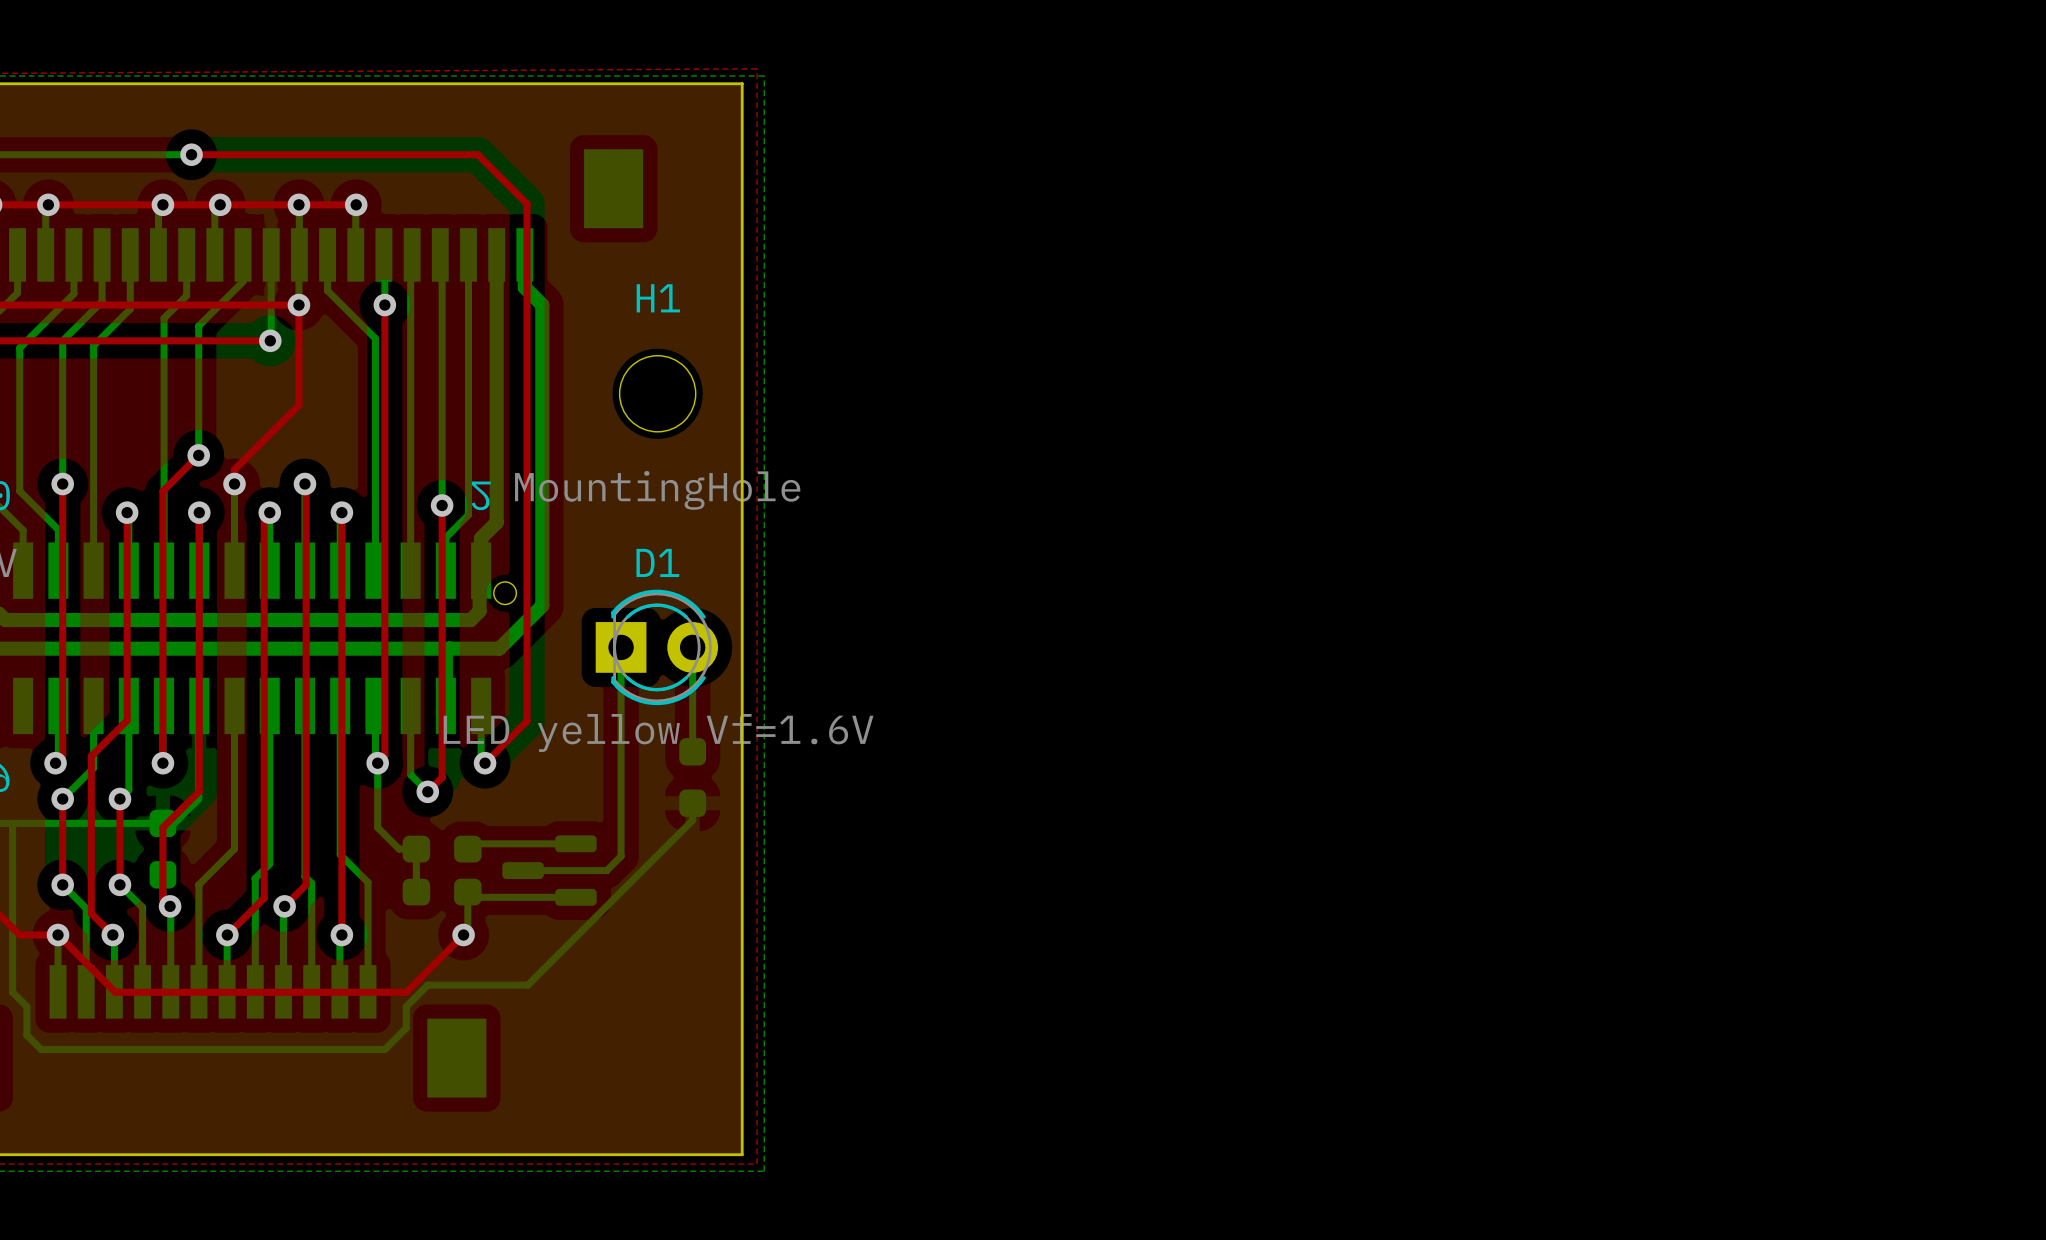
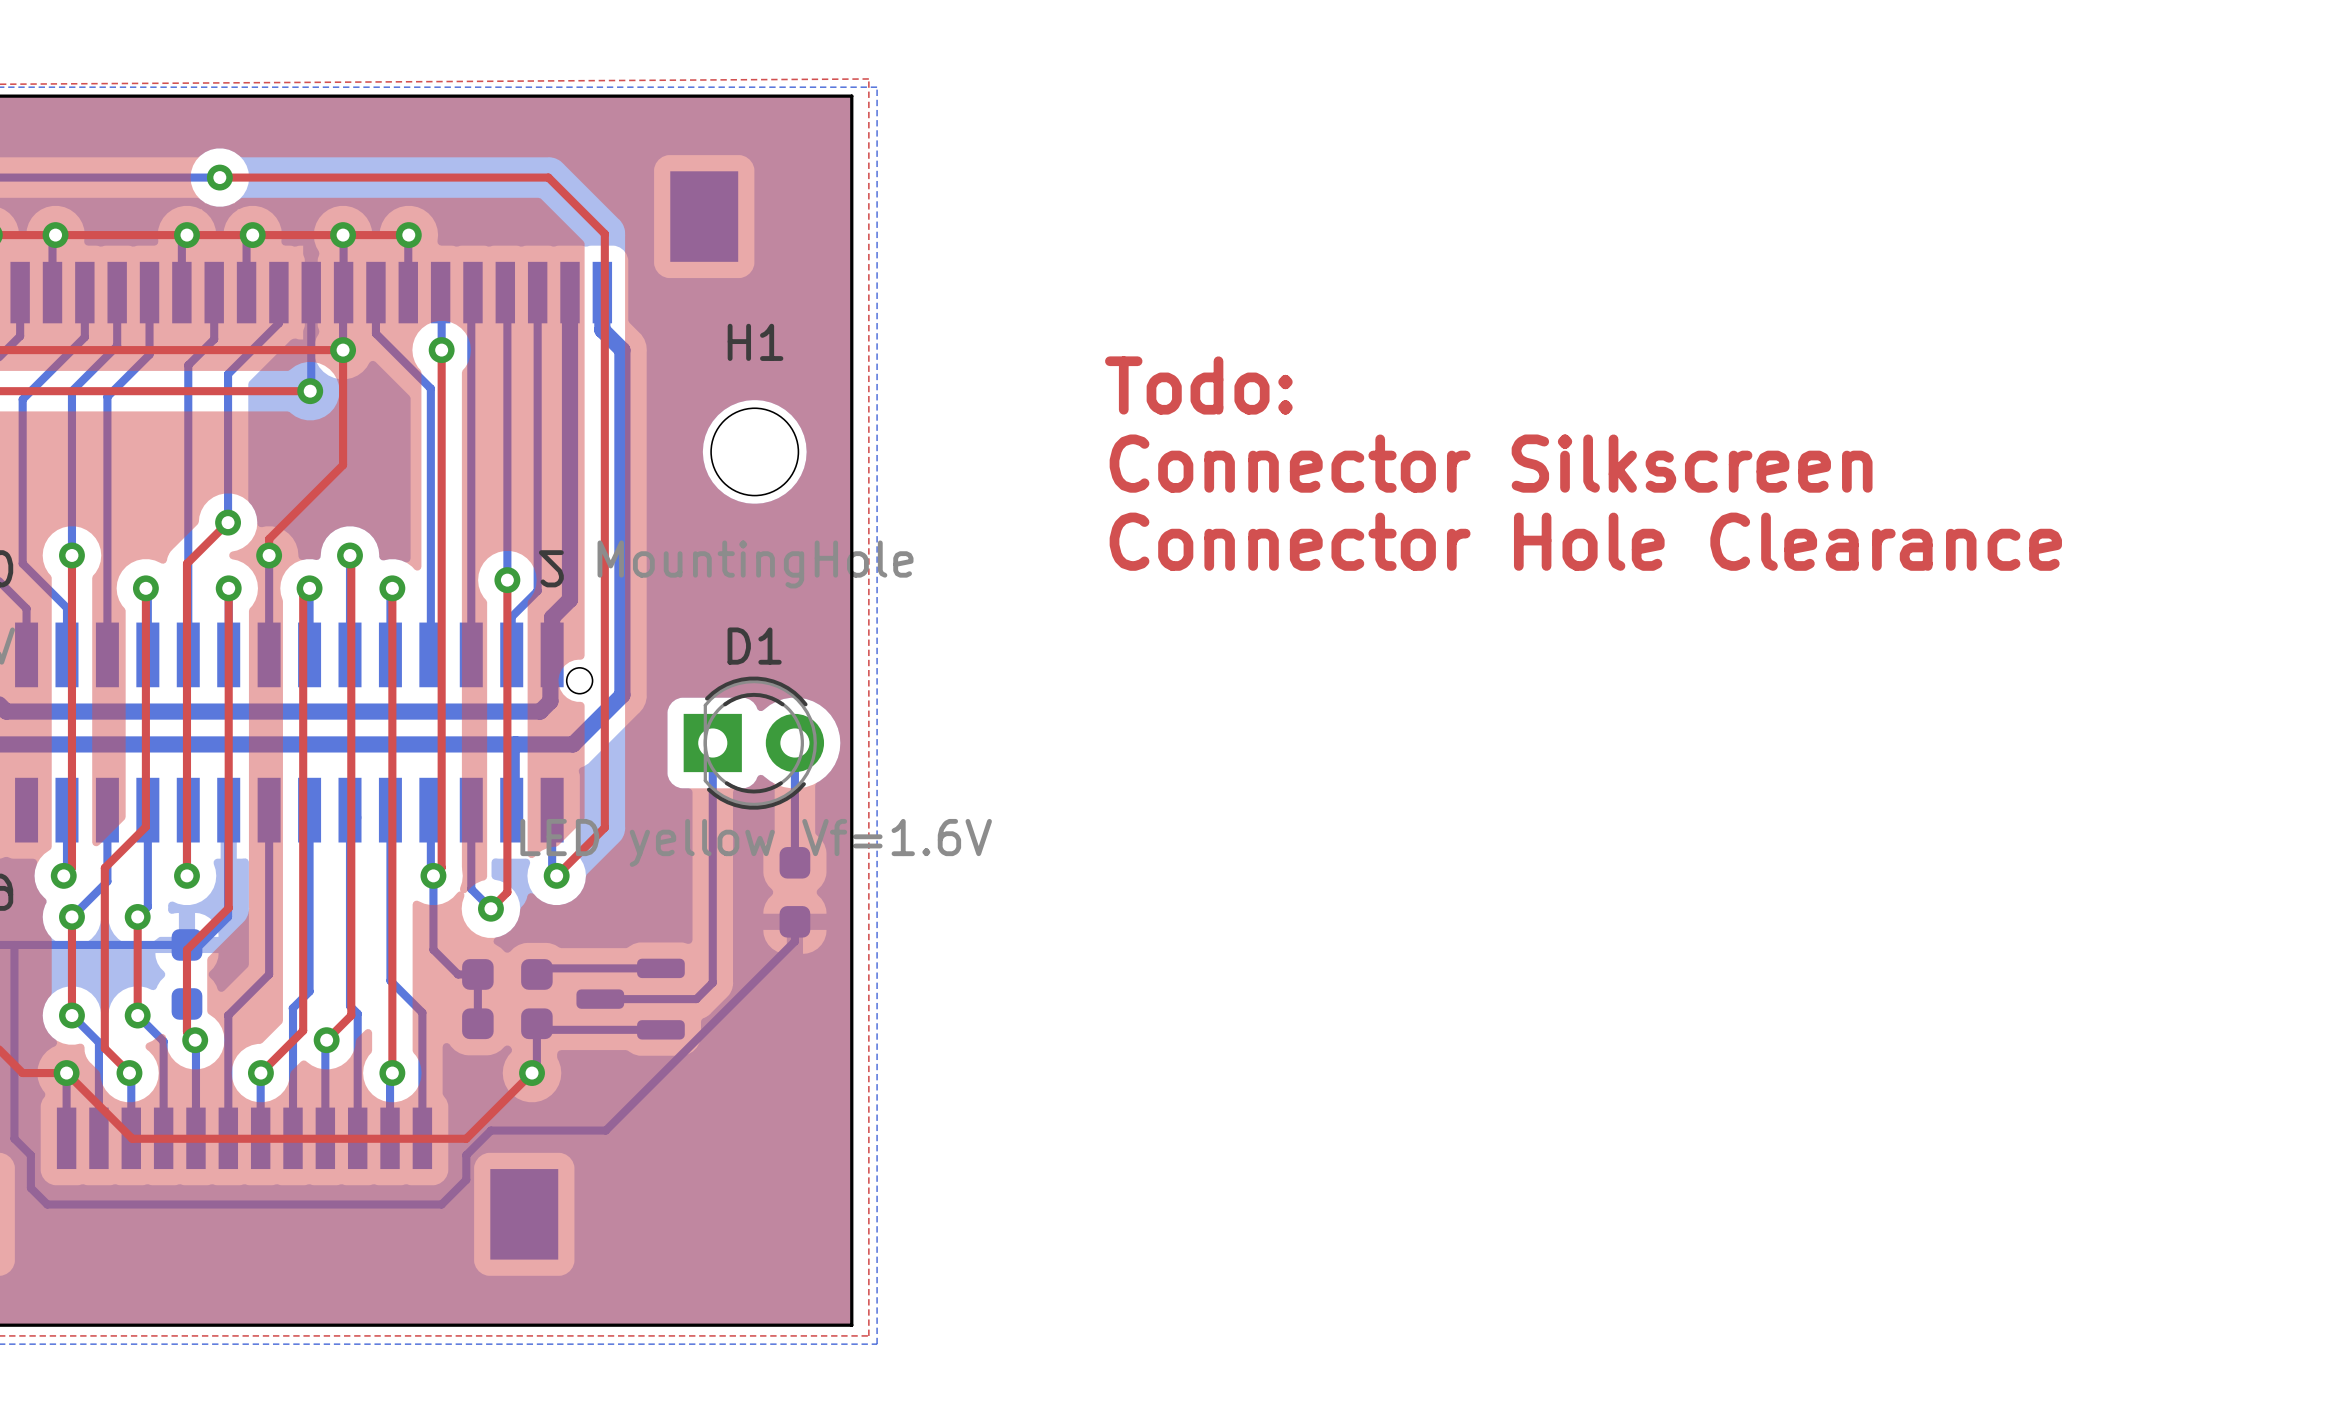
text: none -> Todo: (1198, 385)
text: none -> Connector Silkscreen (1491, 463)
text: none -> Connector Hole Clearance (1585, 541)
D1 footprint: [595, 589, 719, 706] -> [683, 676, 825, 810]

